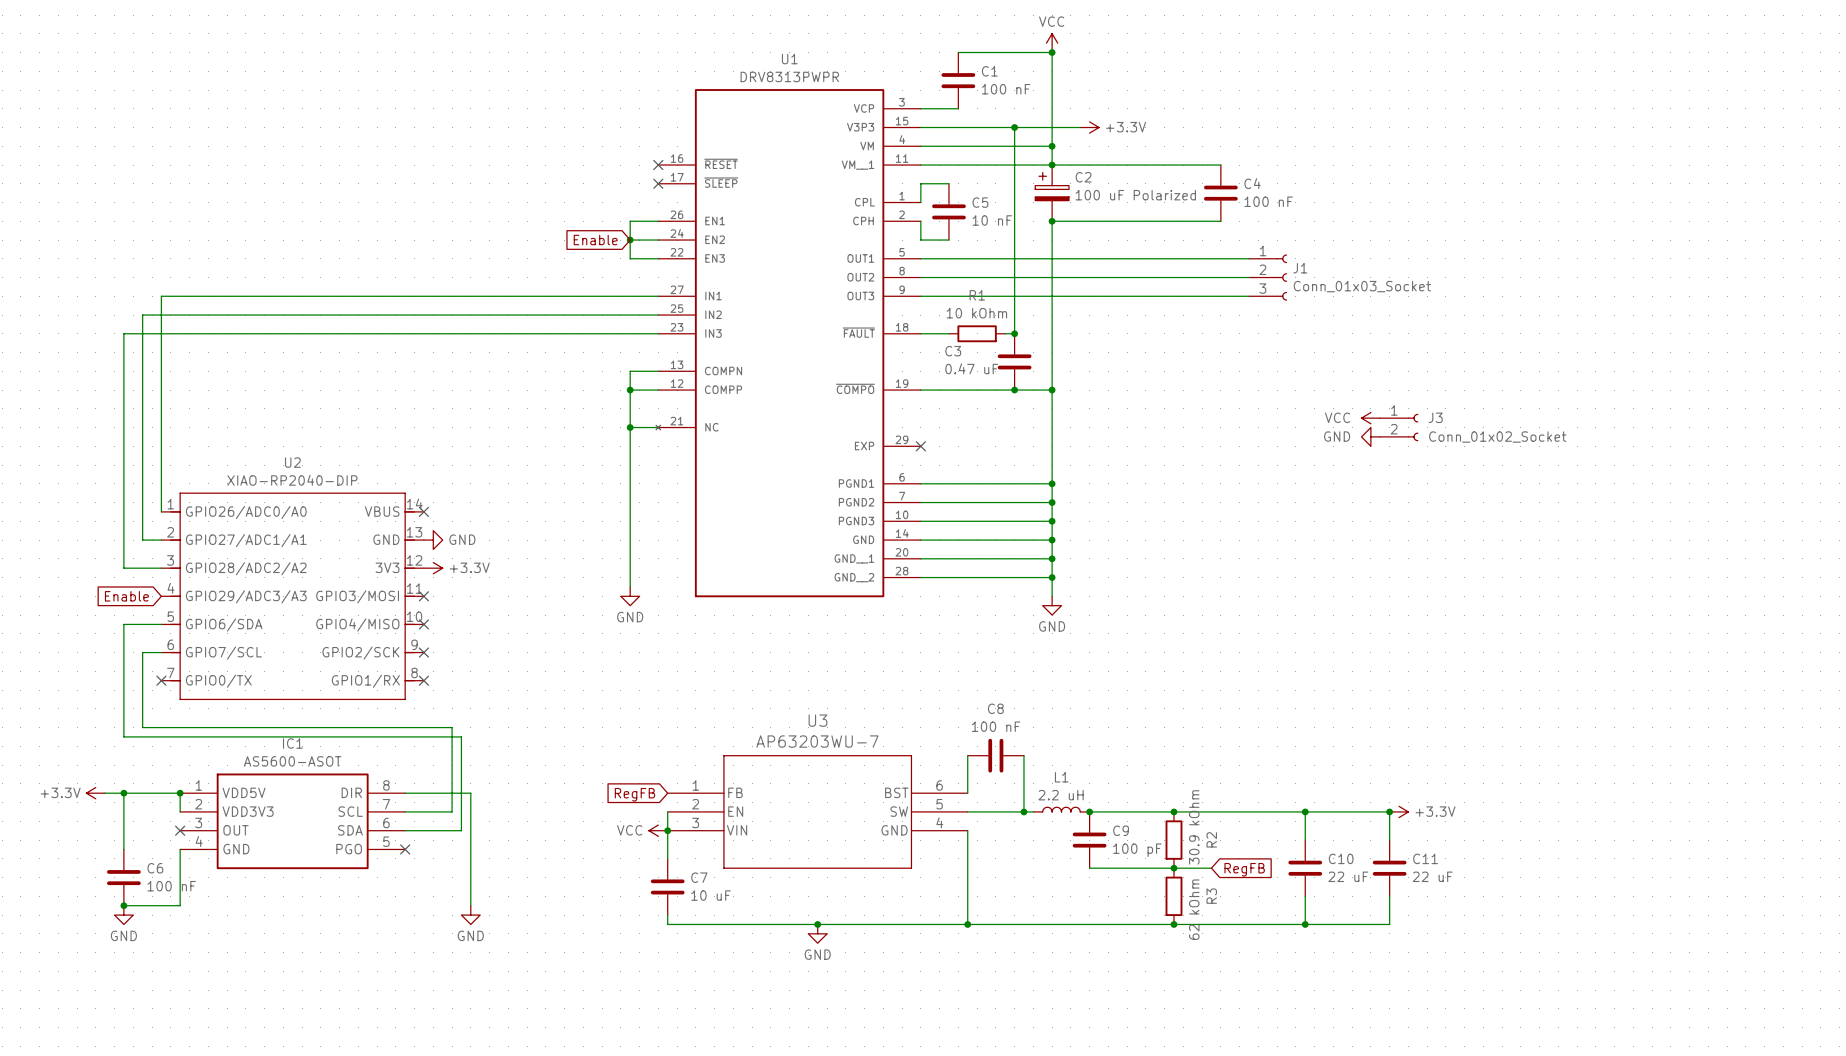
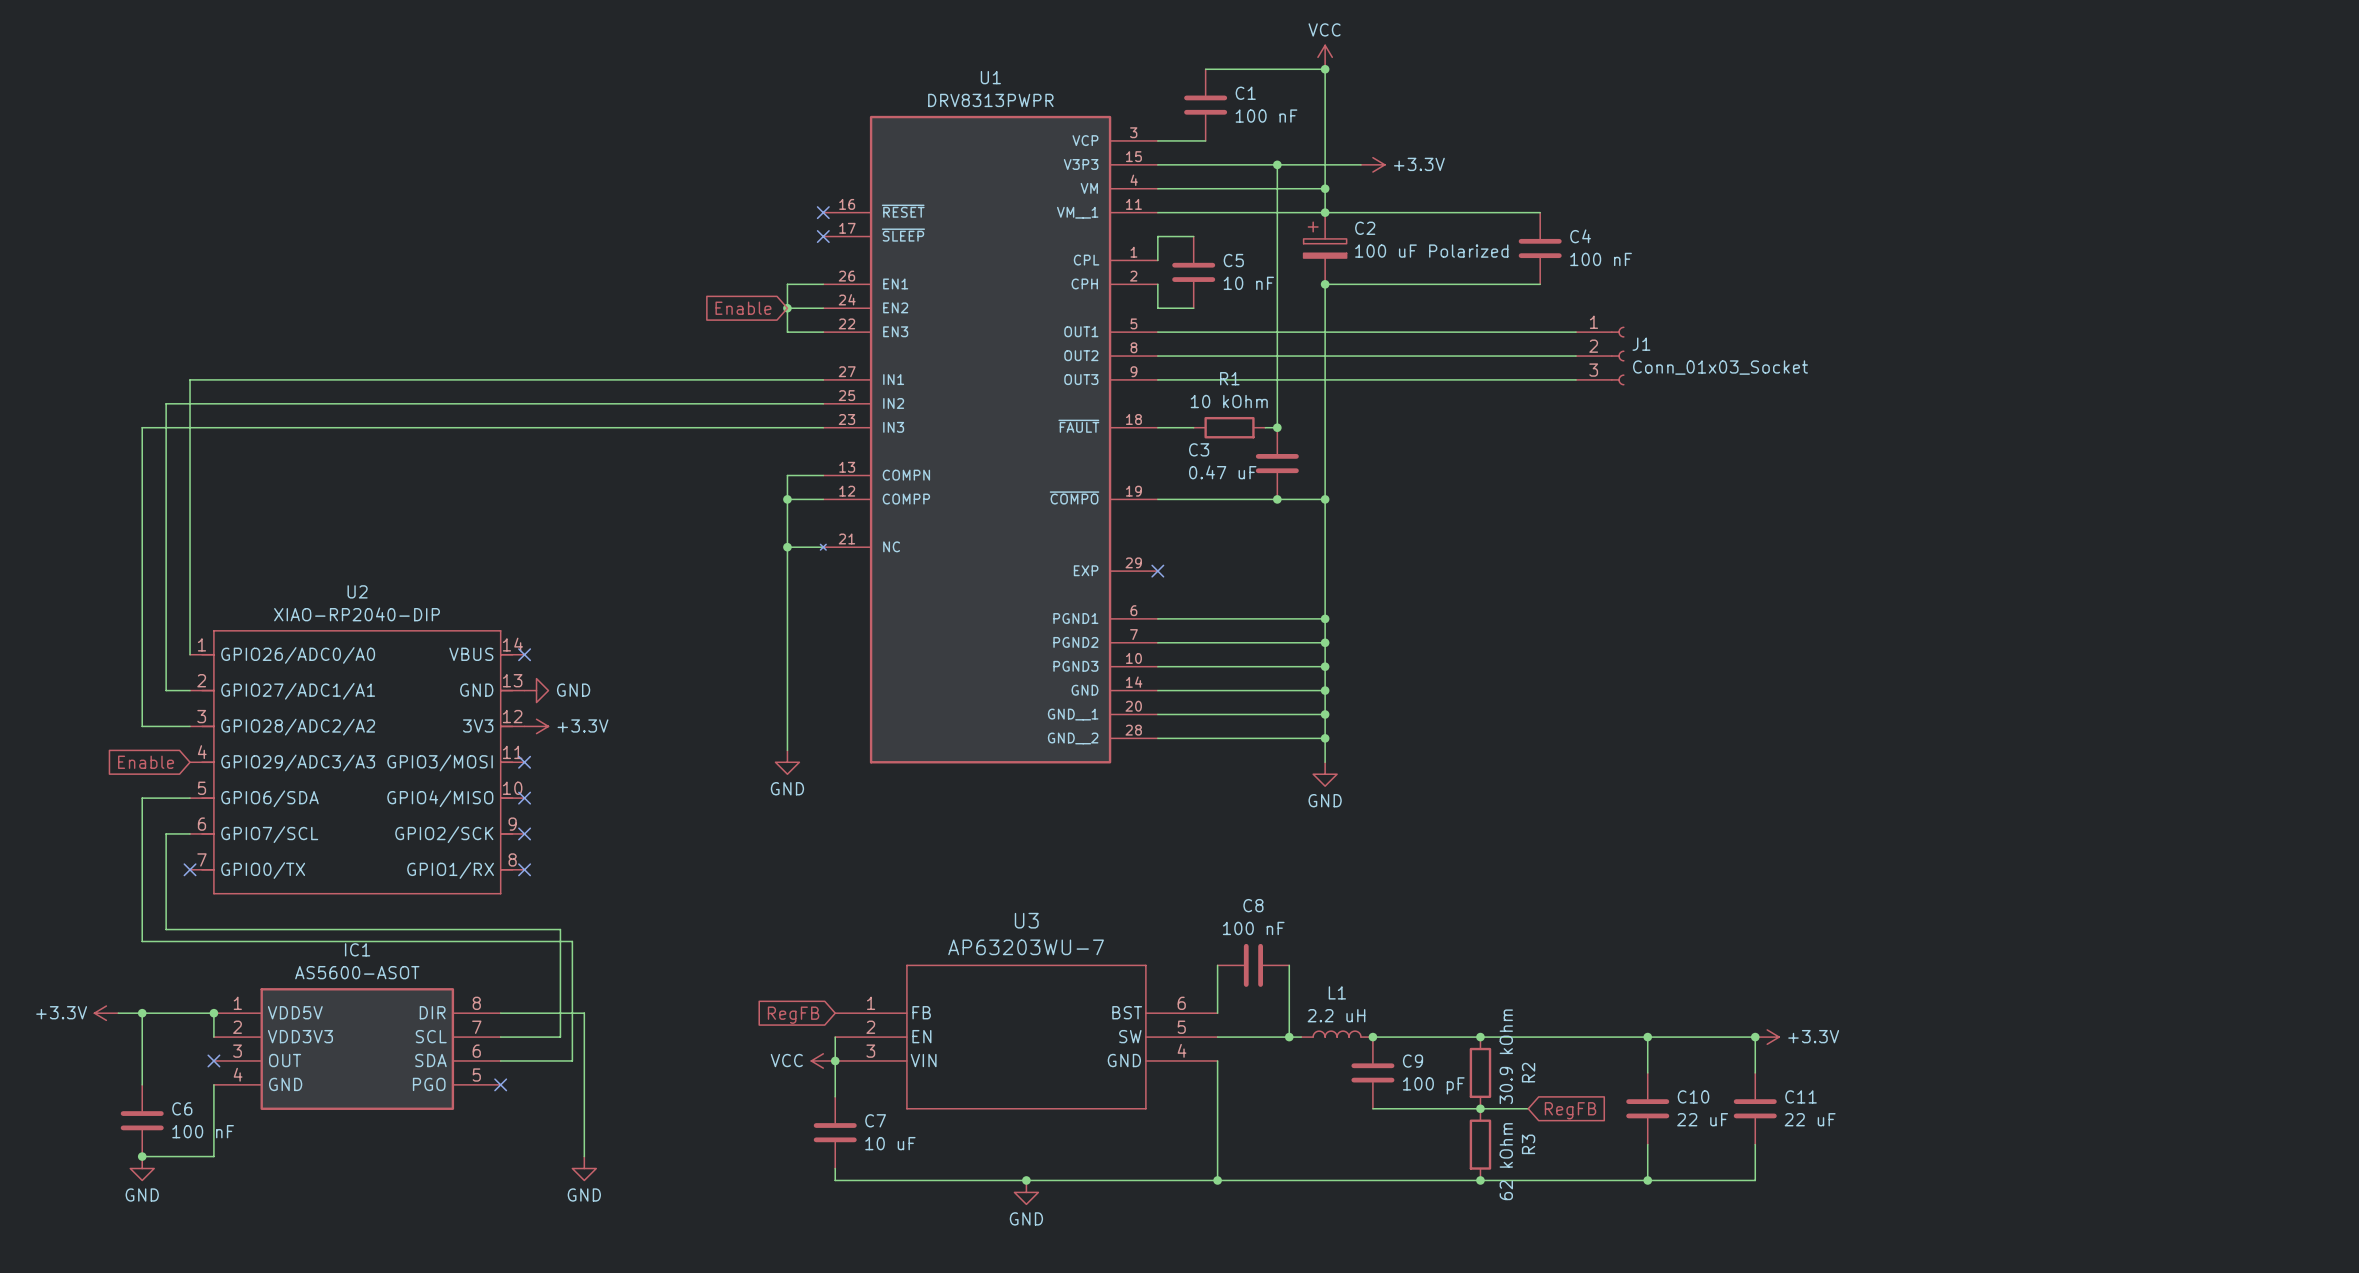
power symbol: VCC (1370, 418) -> none
J3: Conn_01x02_Socket (1399, 427) -> none
power symbol: GND (1370, 436) -> none

